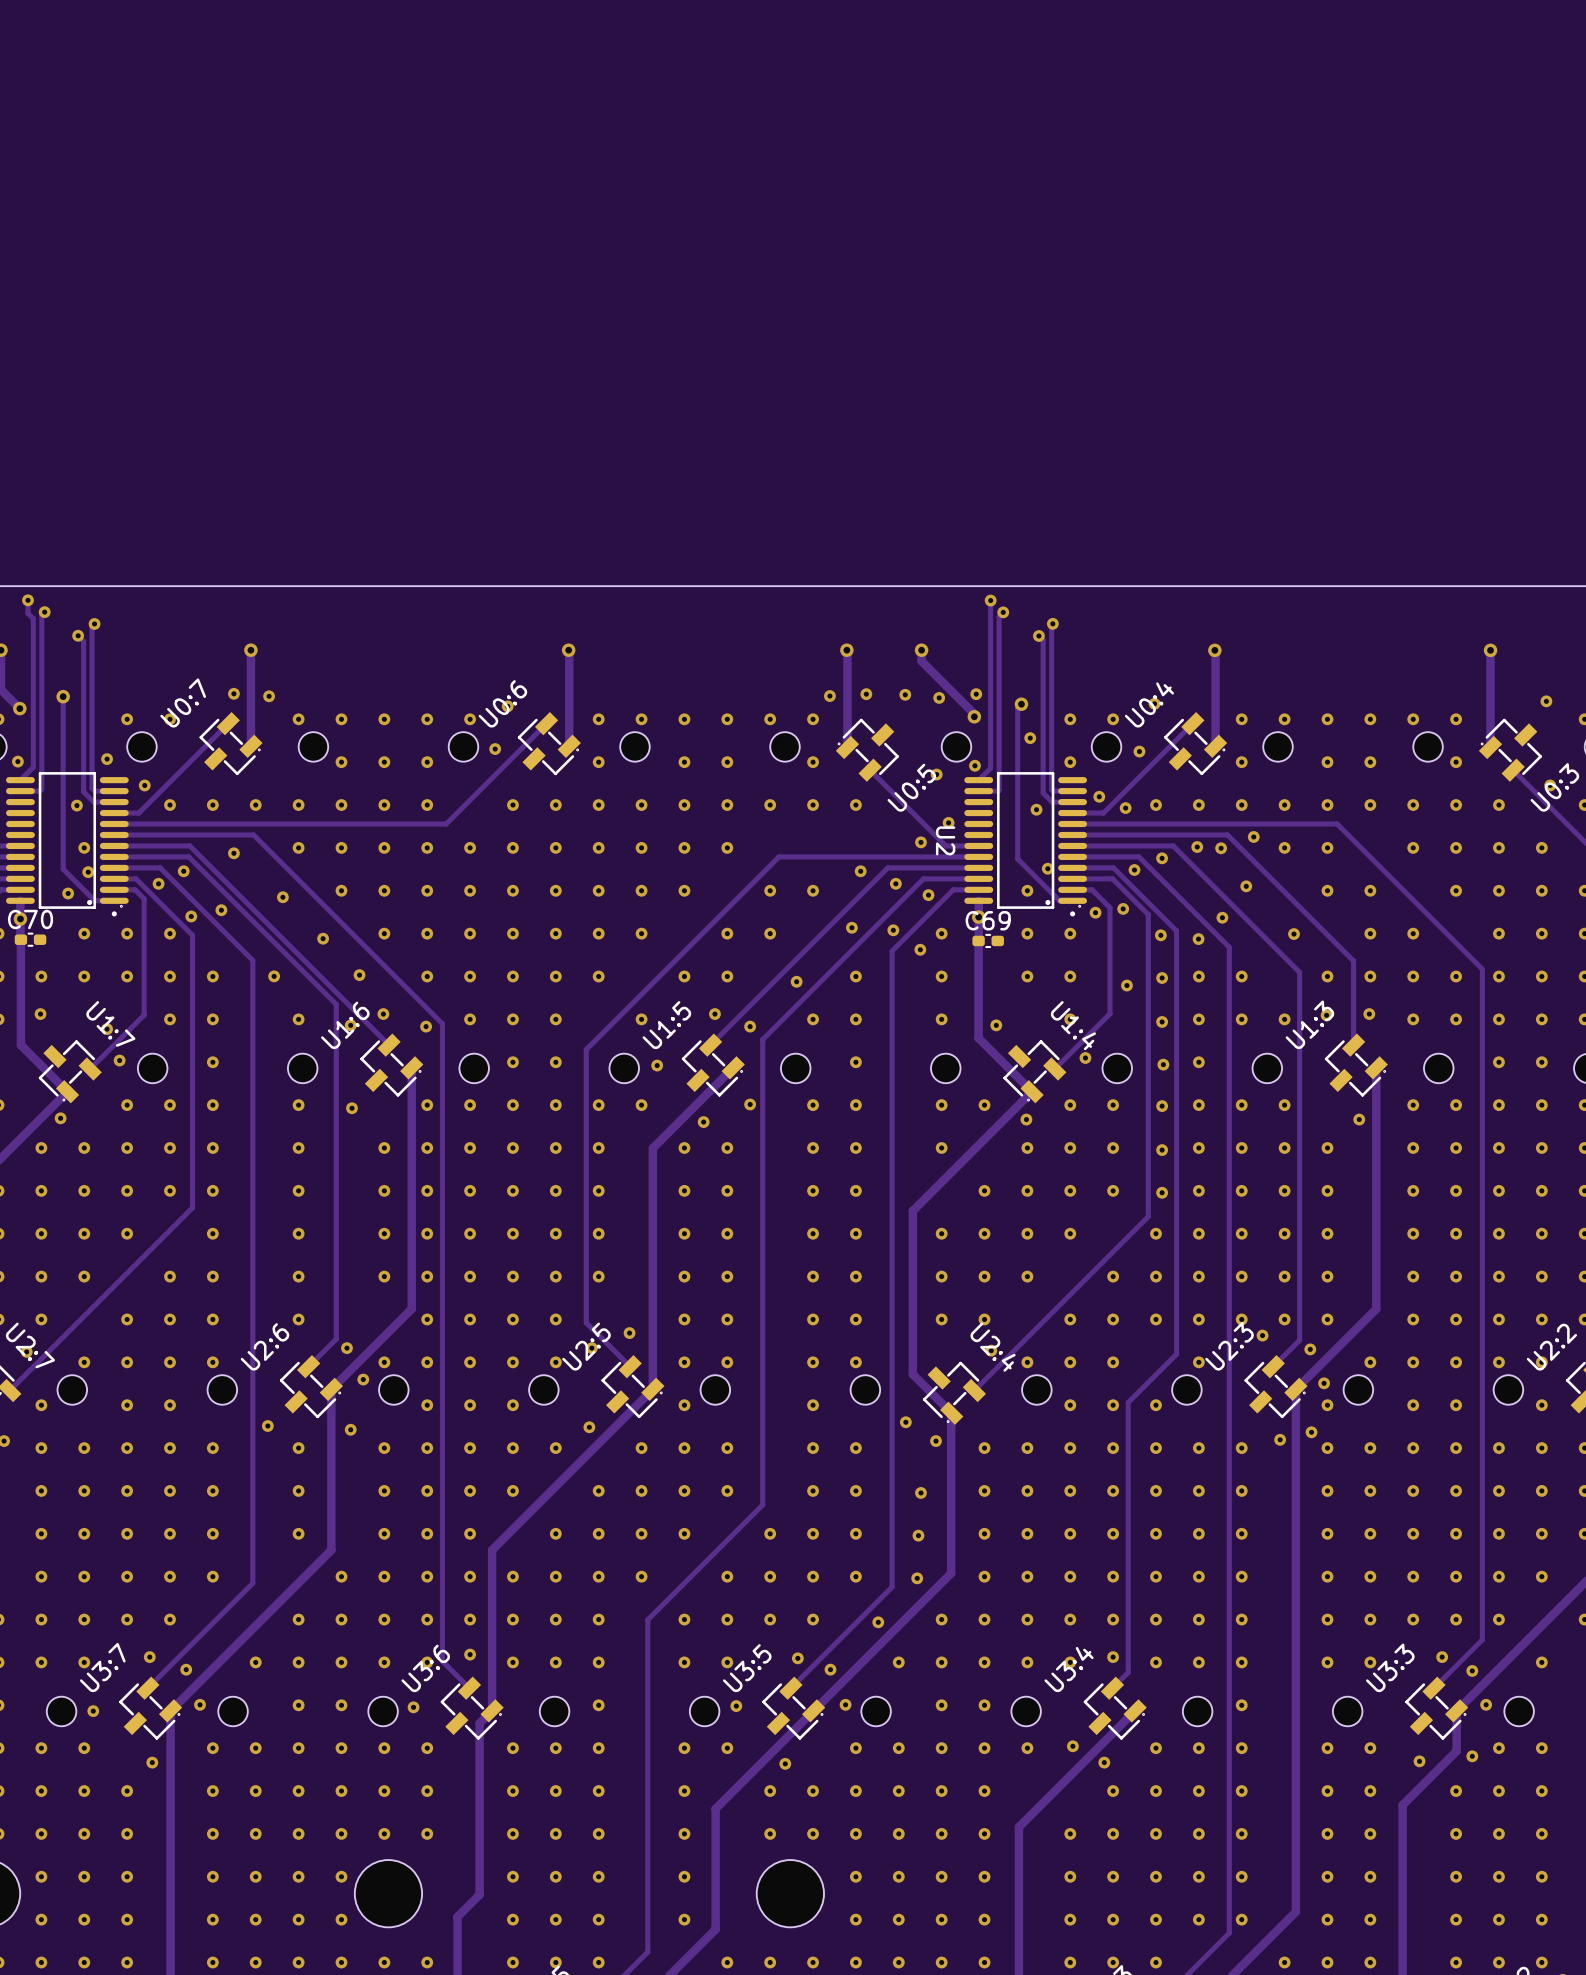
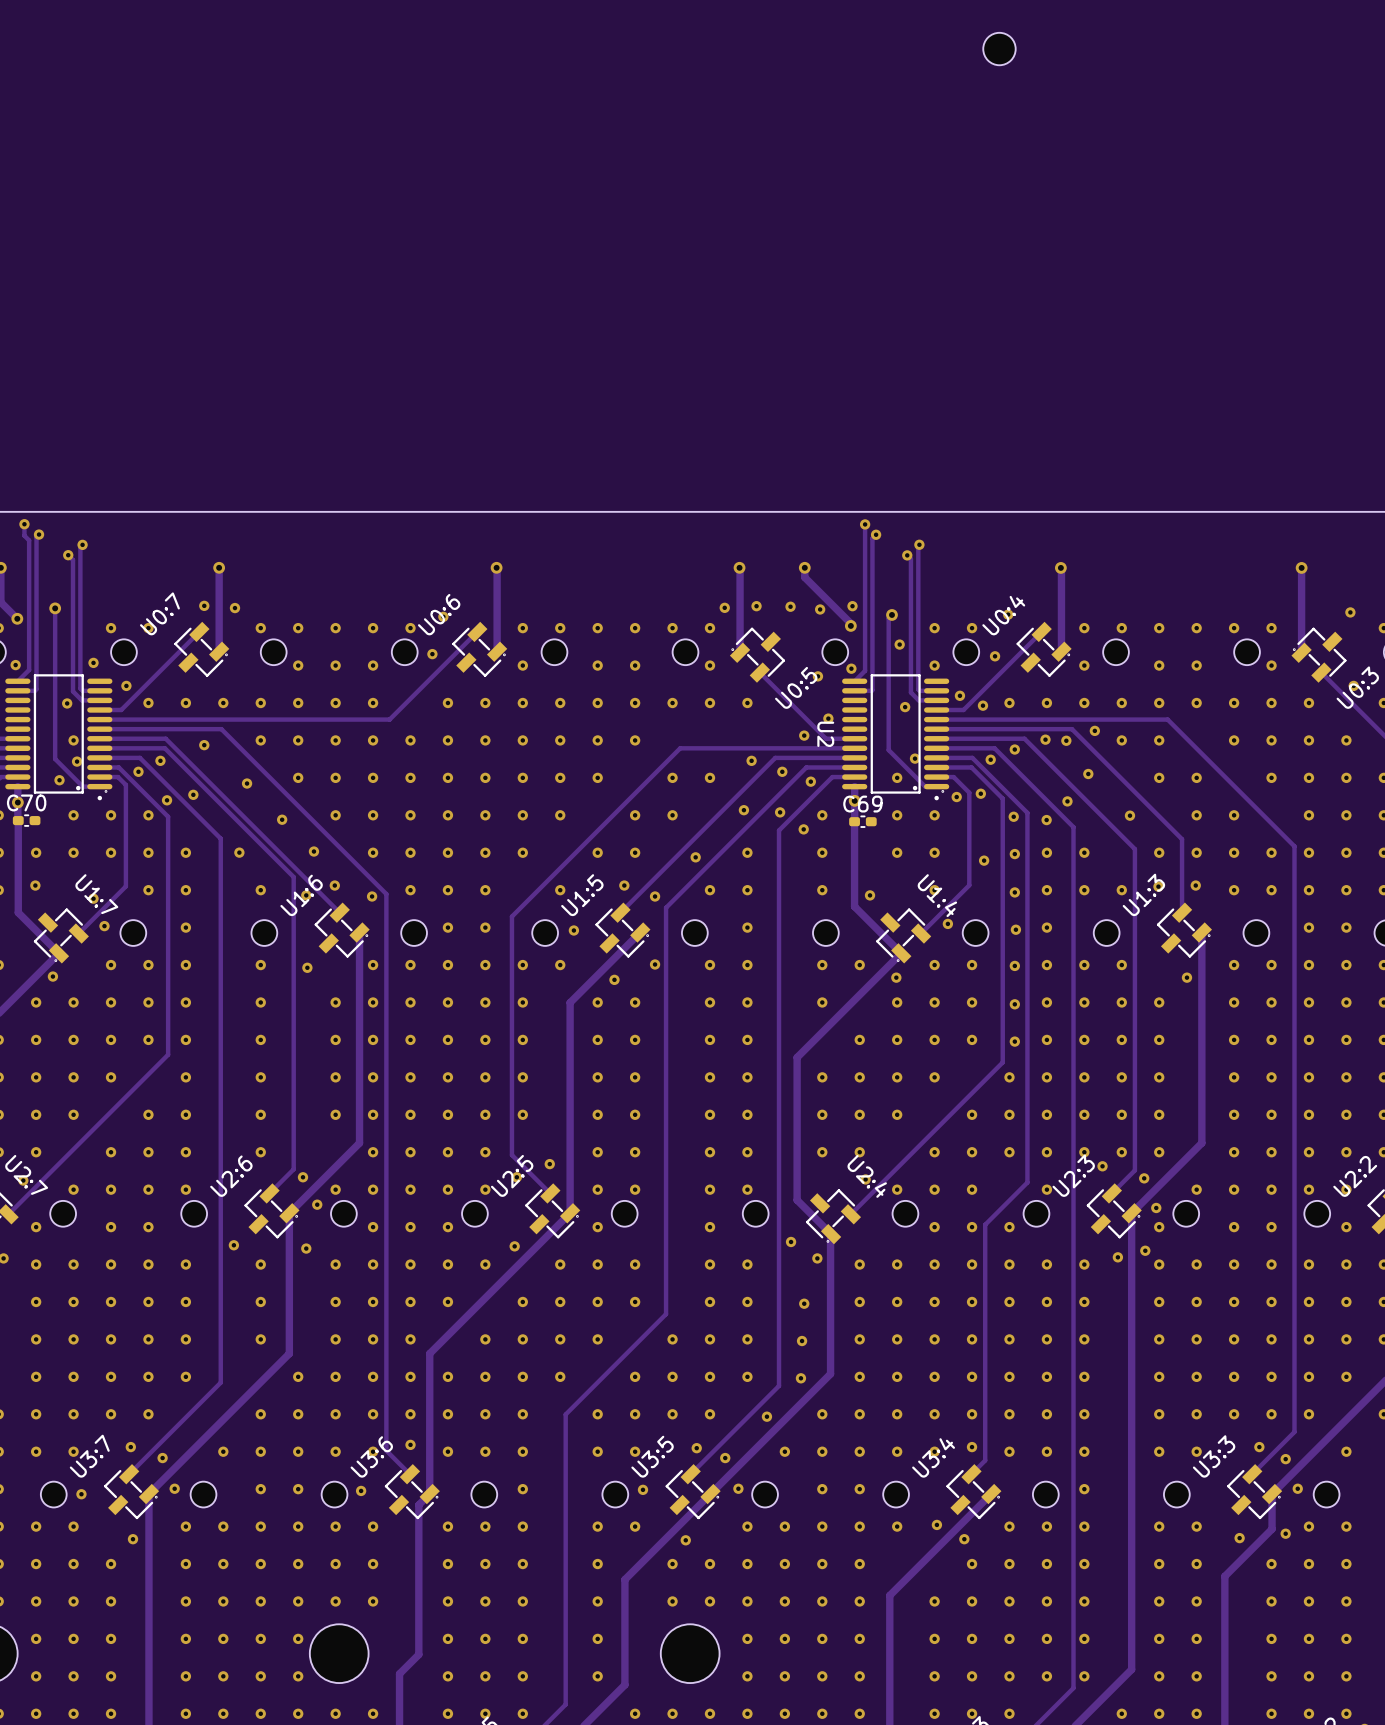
part: none -> (999, 49)

